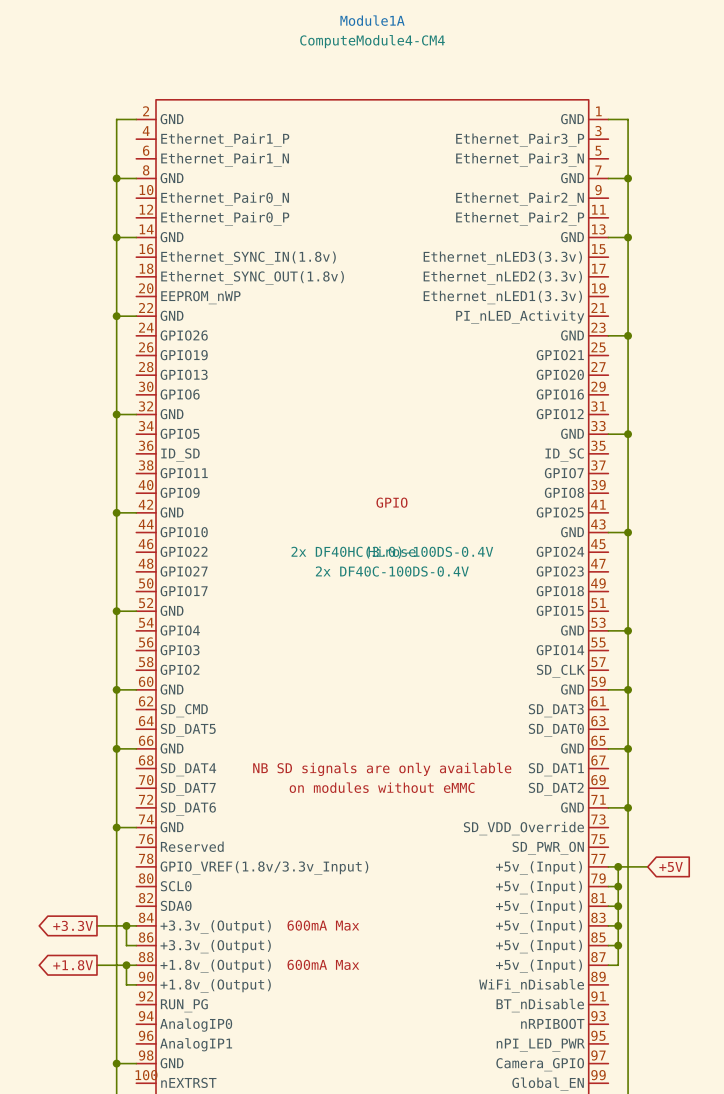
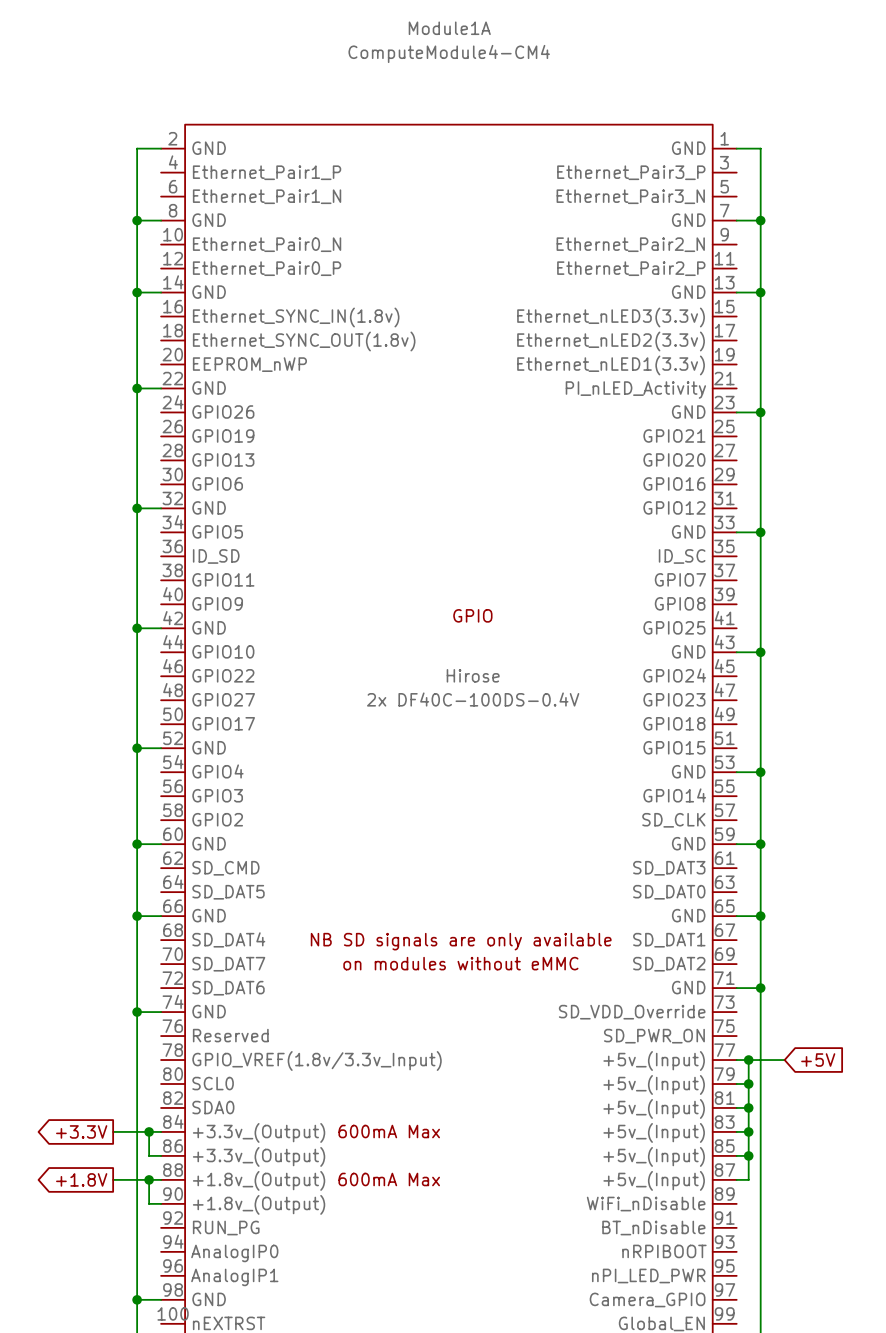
Module1A text: 2x DF40HC(3.0)-100DS-0.4V (392, 552) -> none

